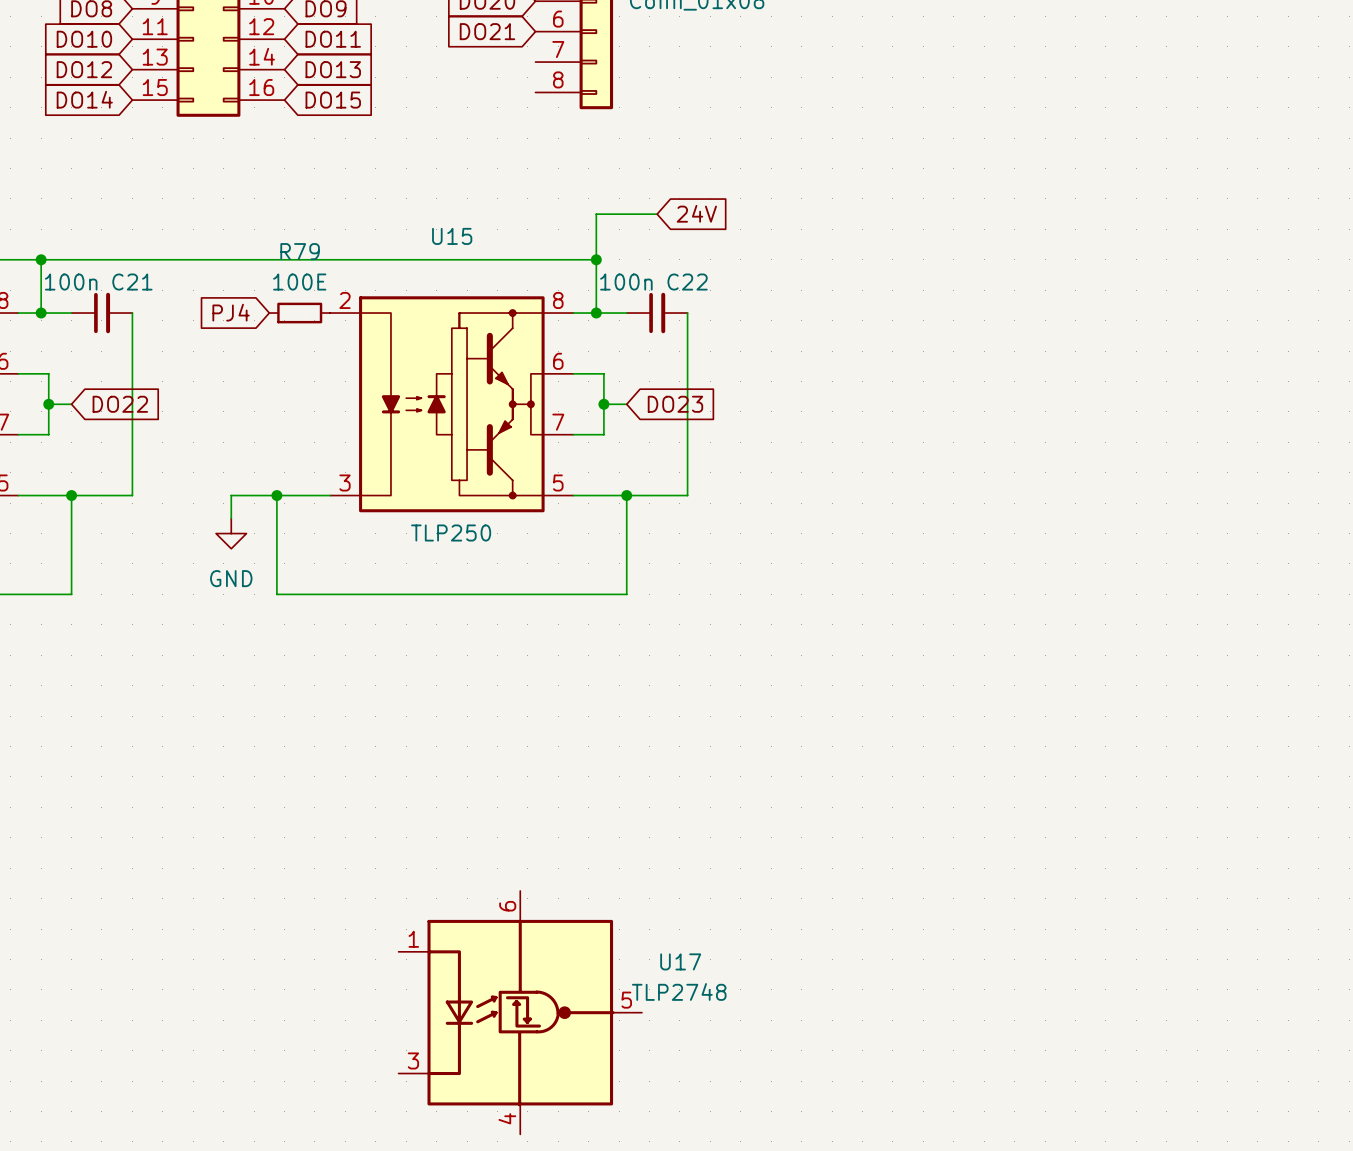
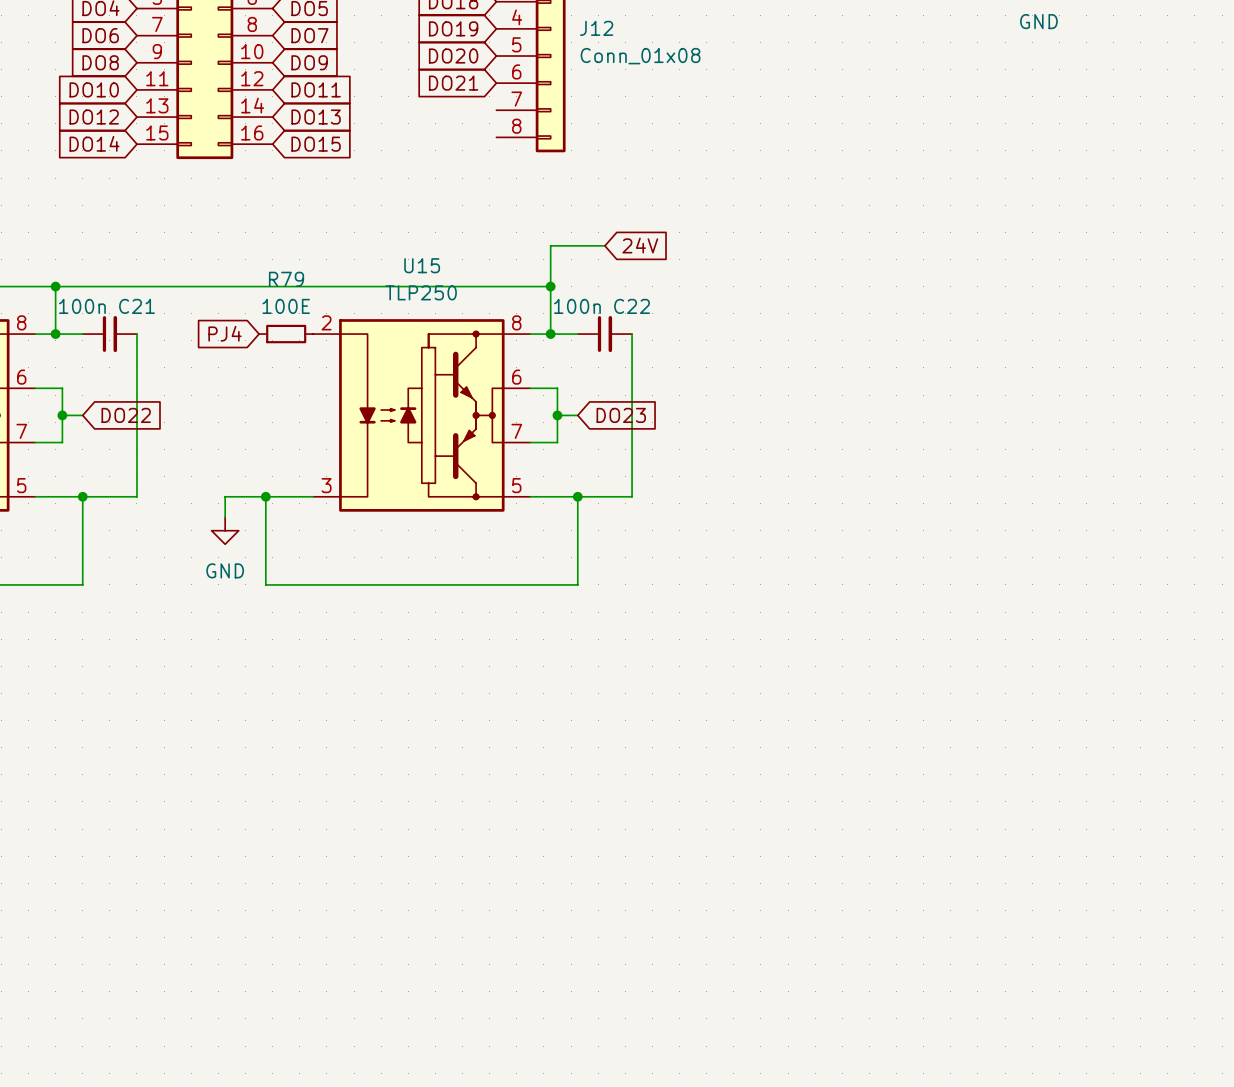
U15 value position: TLP250 (451, 532) -> TLP250 (421, 292)
U17: TLP2748 (520, 1012) -> none

